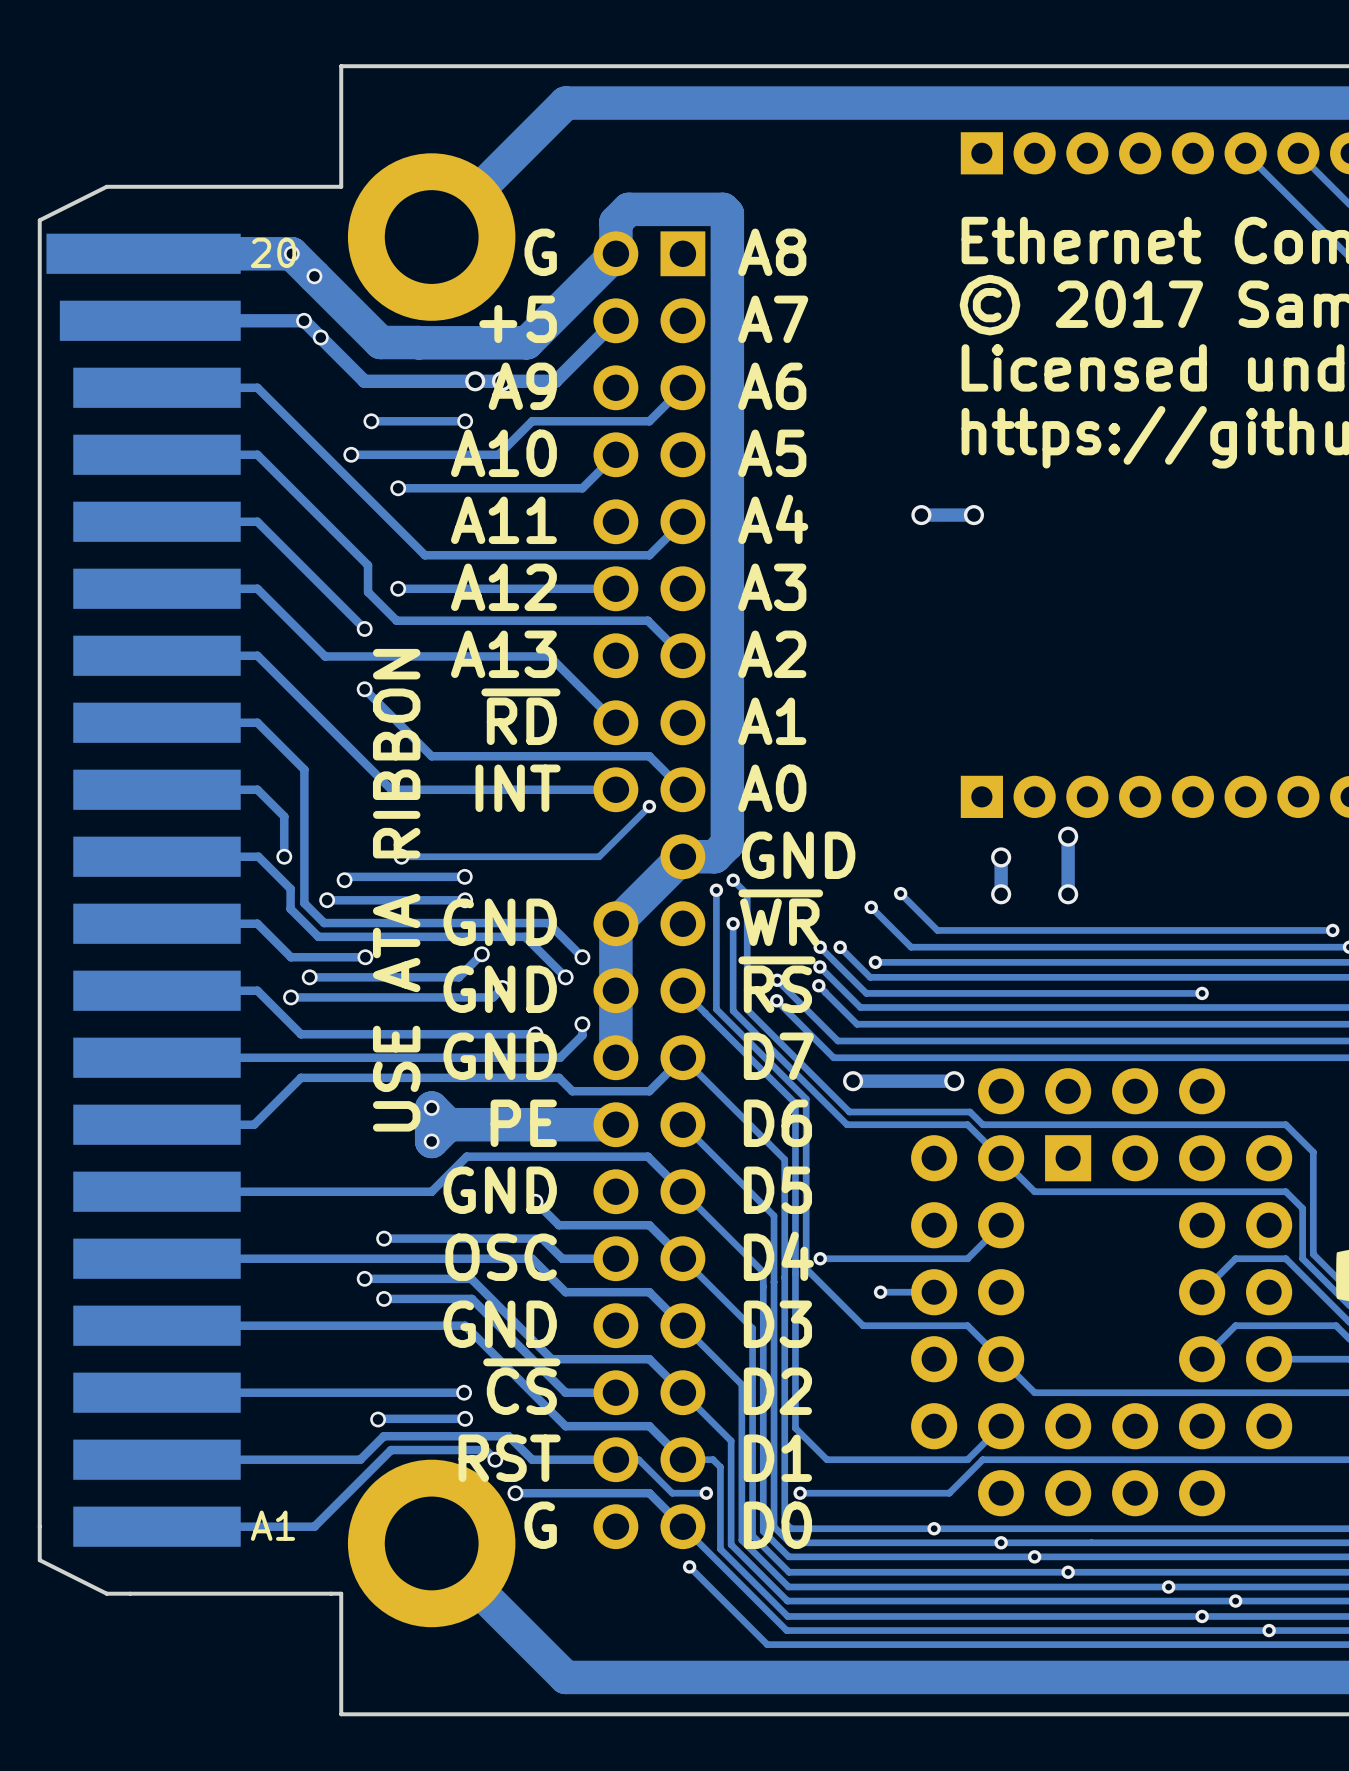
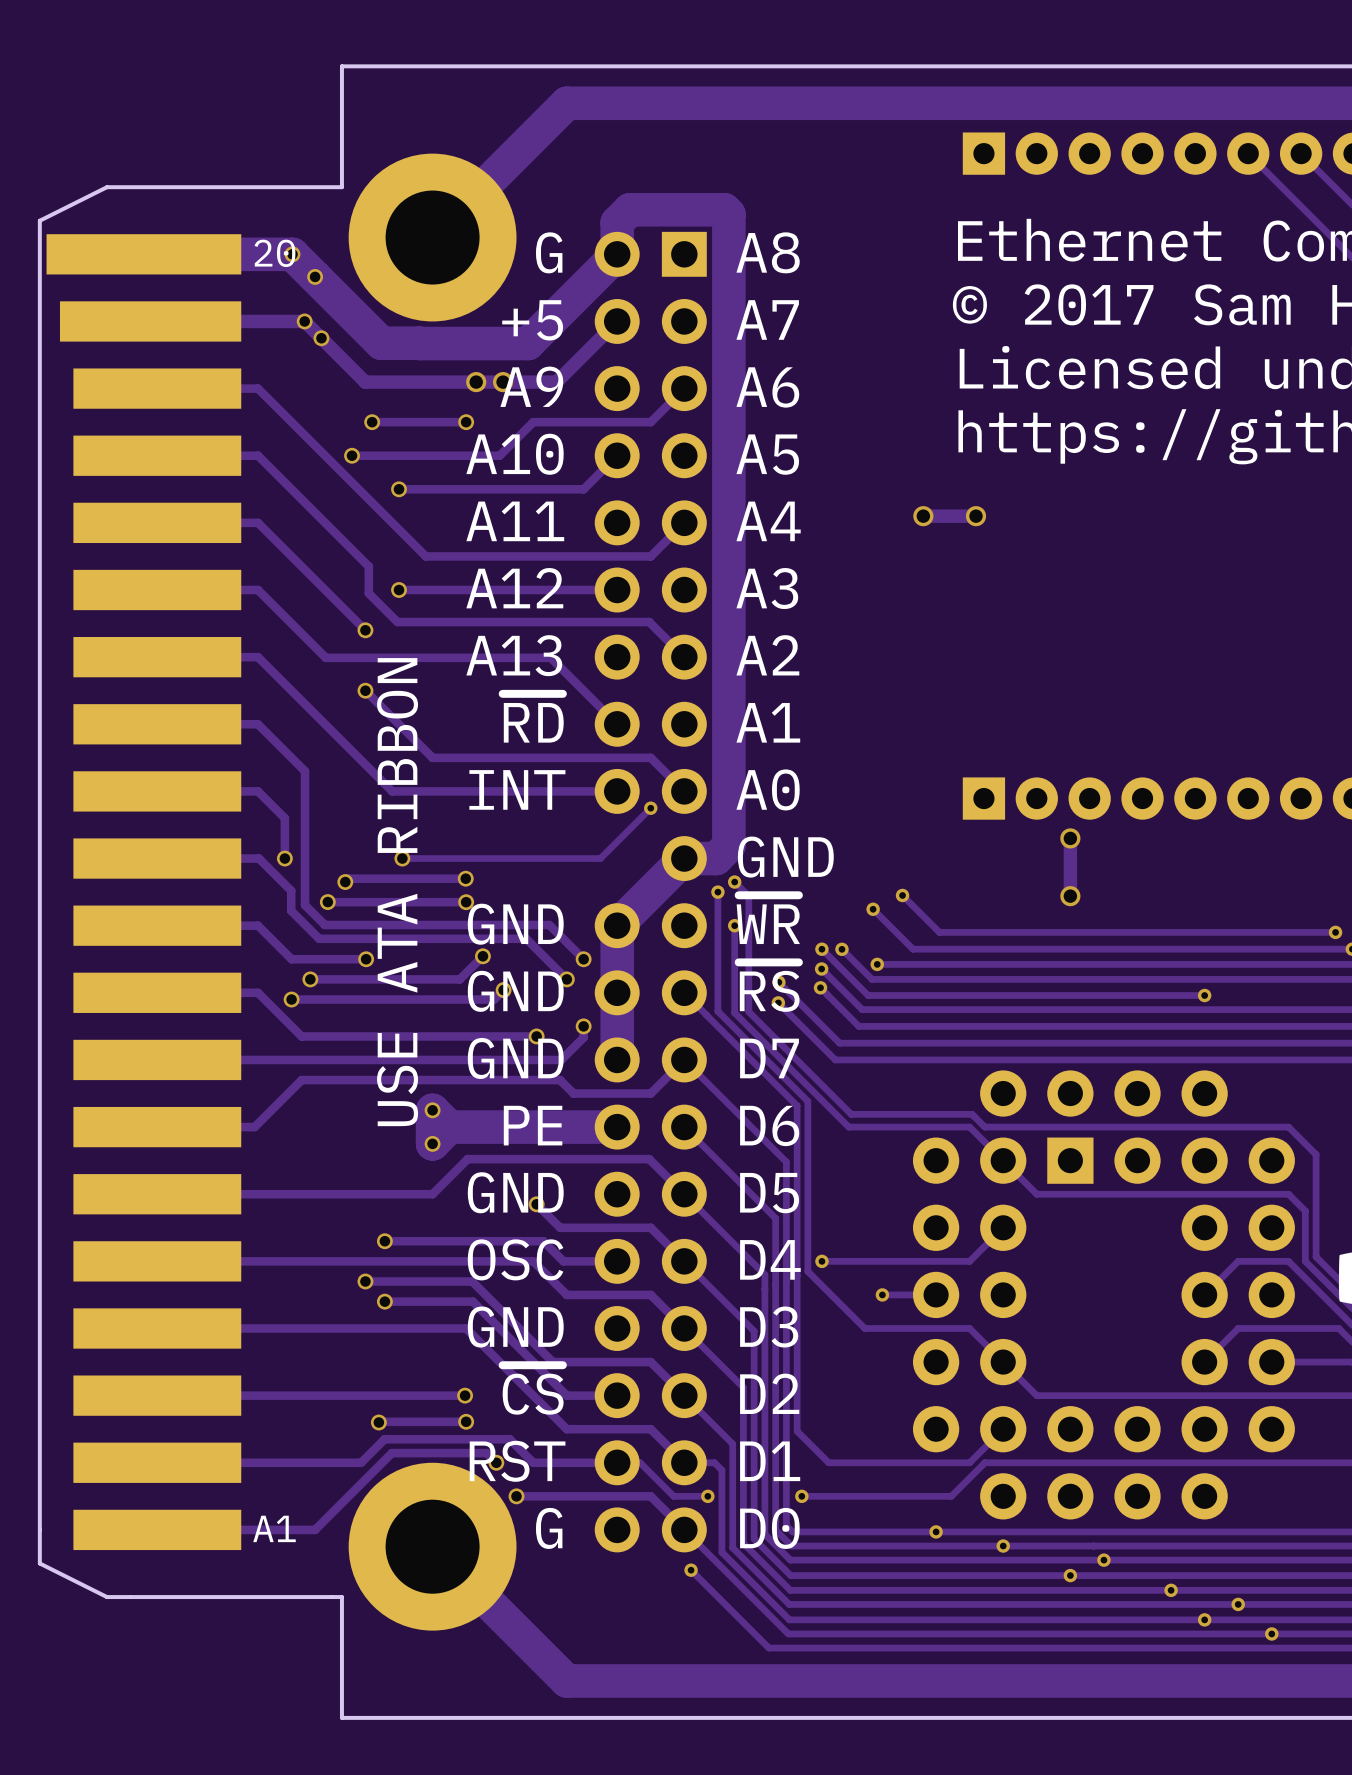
track: (1001, 857) (1001, 894) -> none
via: (1001, 857) -> none
via: (1001, 894) -> none
via: (853, 1081) -> none
track: (954, 1081) (853, 1081) -> none
via: (954, 1081) -> none
via position: (1034, 1556) -> (1103, 1560)

